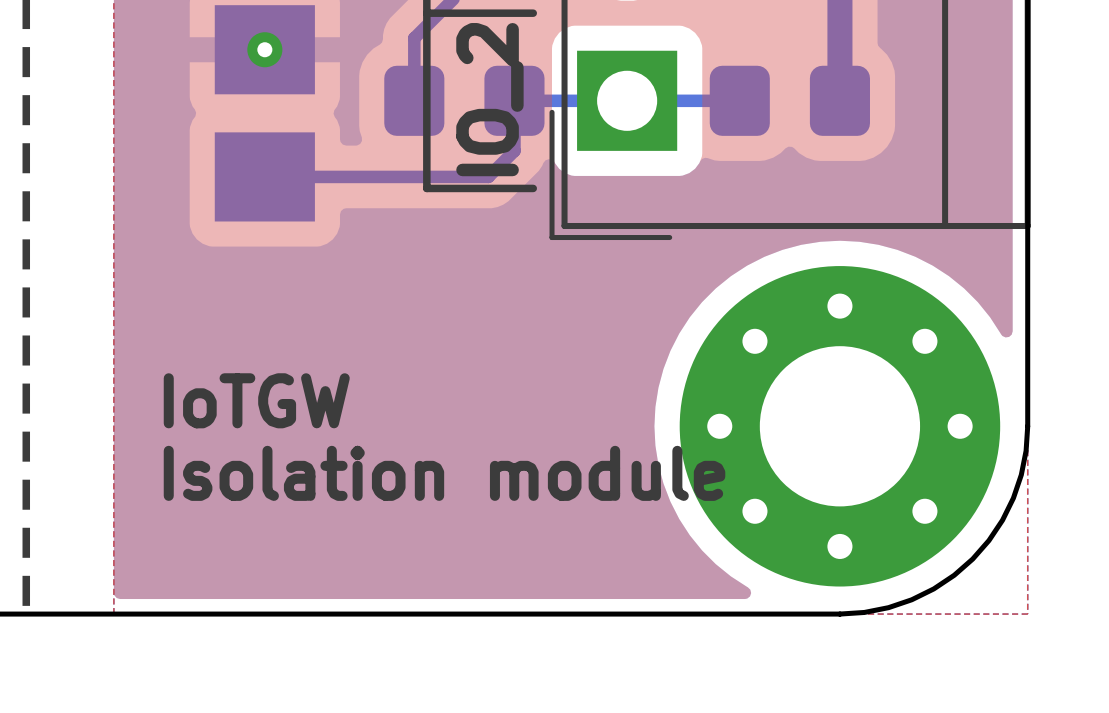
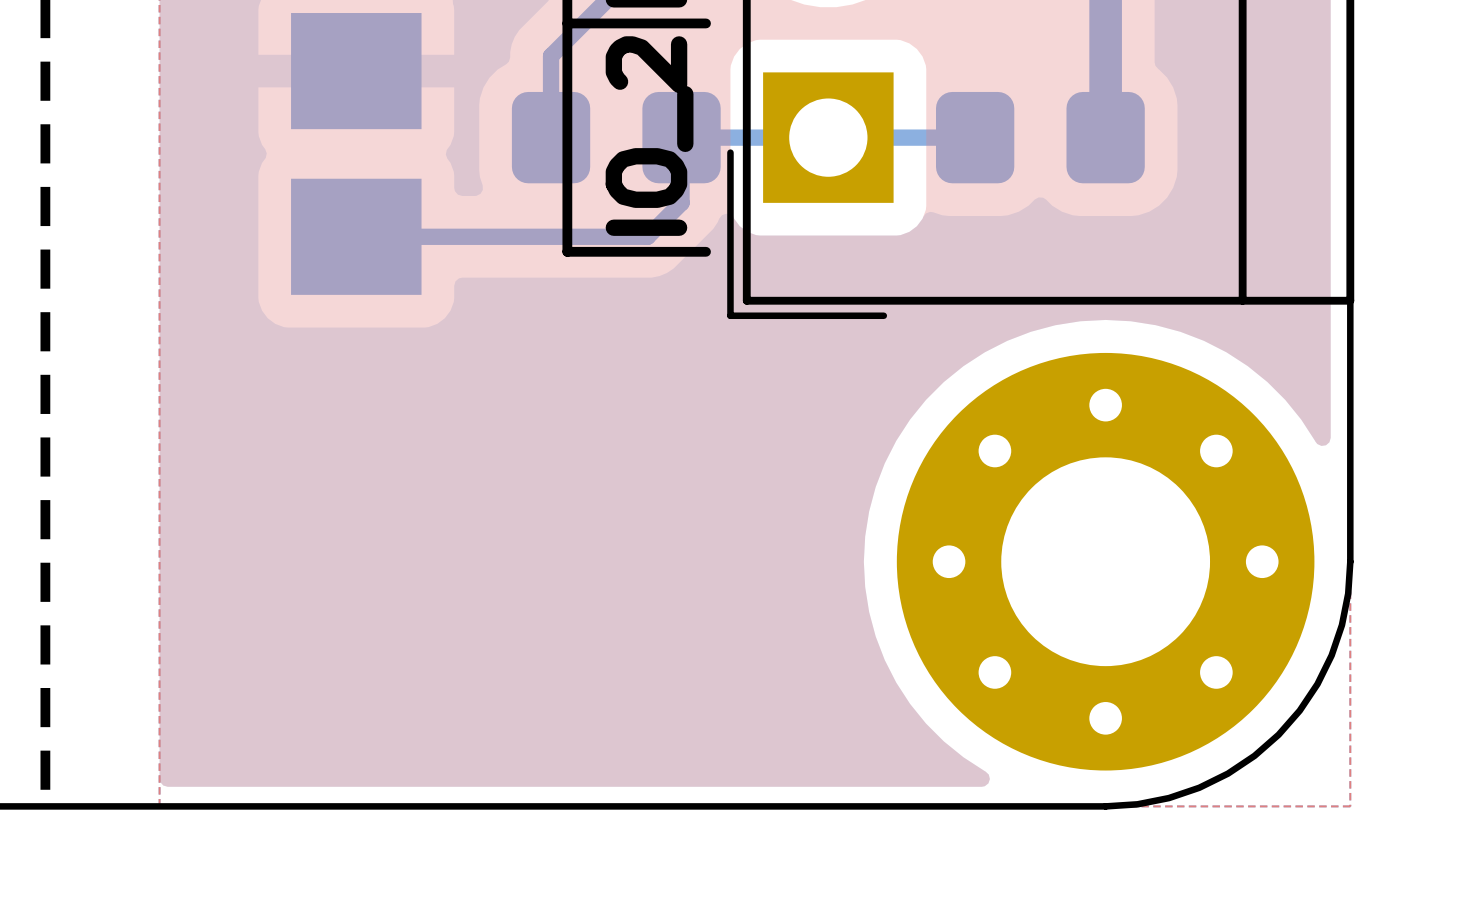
via: (264, 49) -> none
text: IoTGW (256, 400) -> none
text: Isolation module (444, 473) -> none

